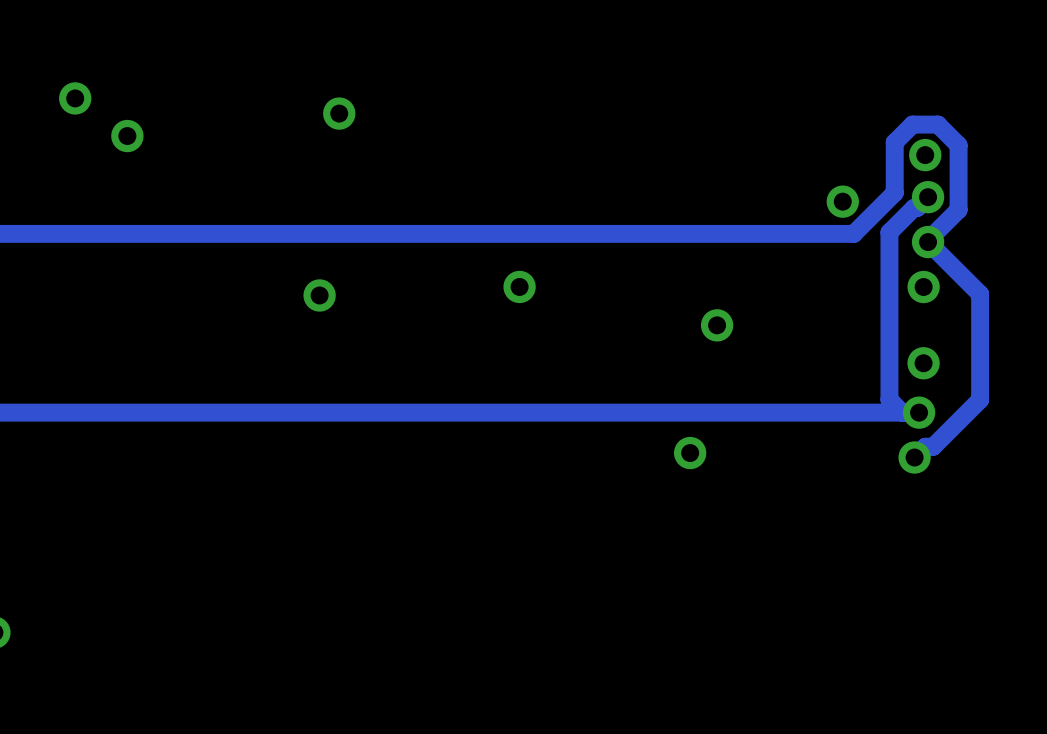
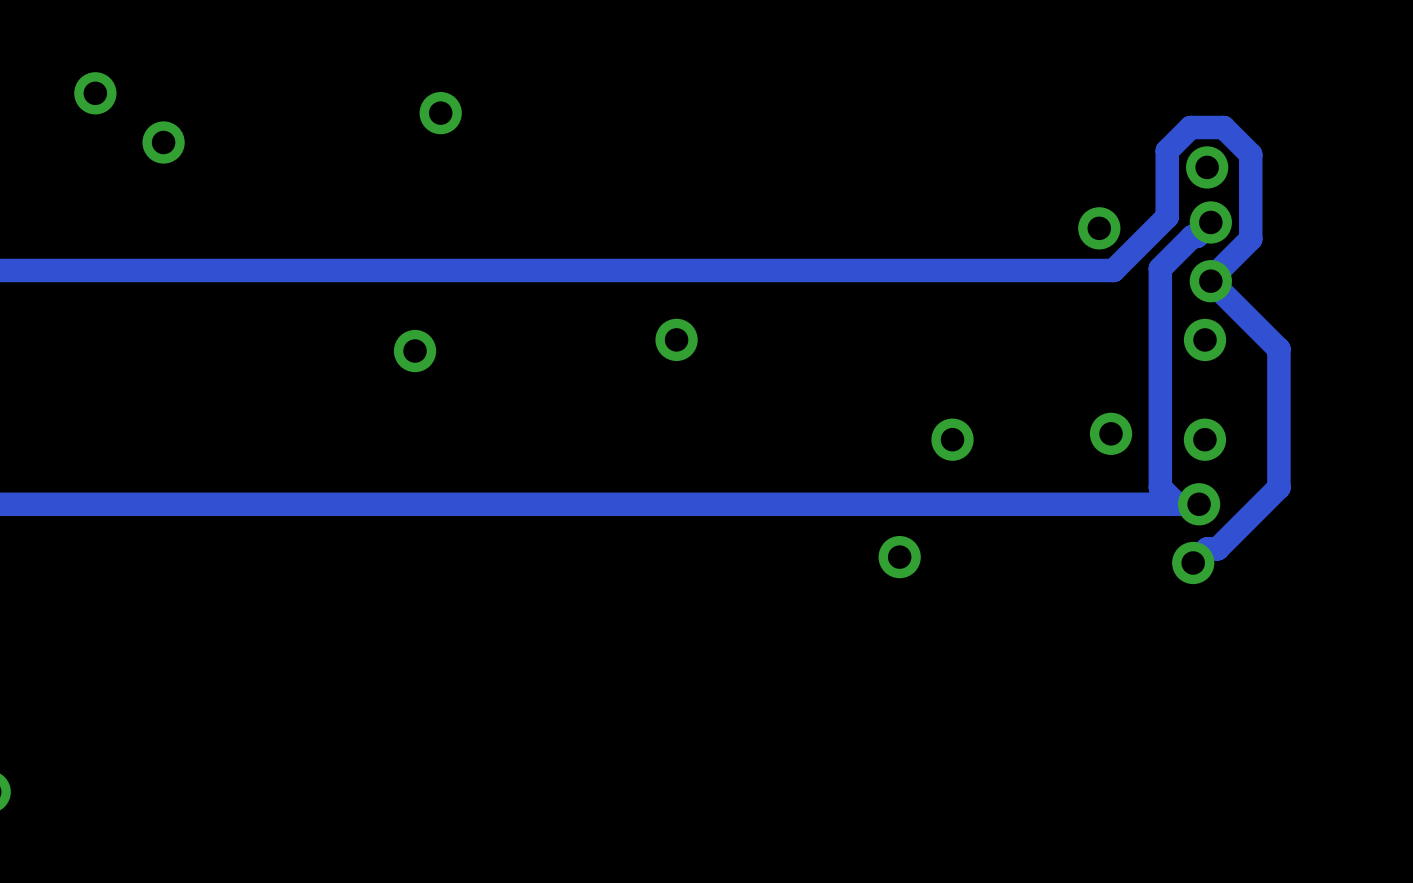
via position: (717, 325) -> (952, 439)
via: none -> (1111, 433)

